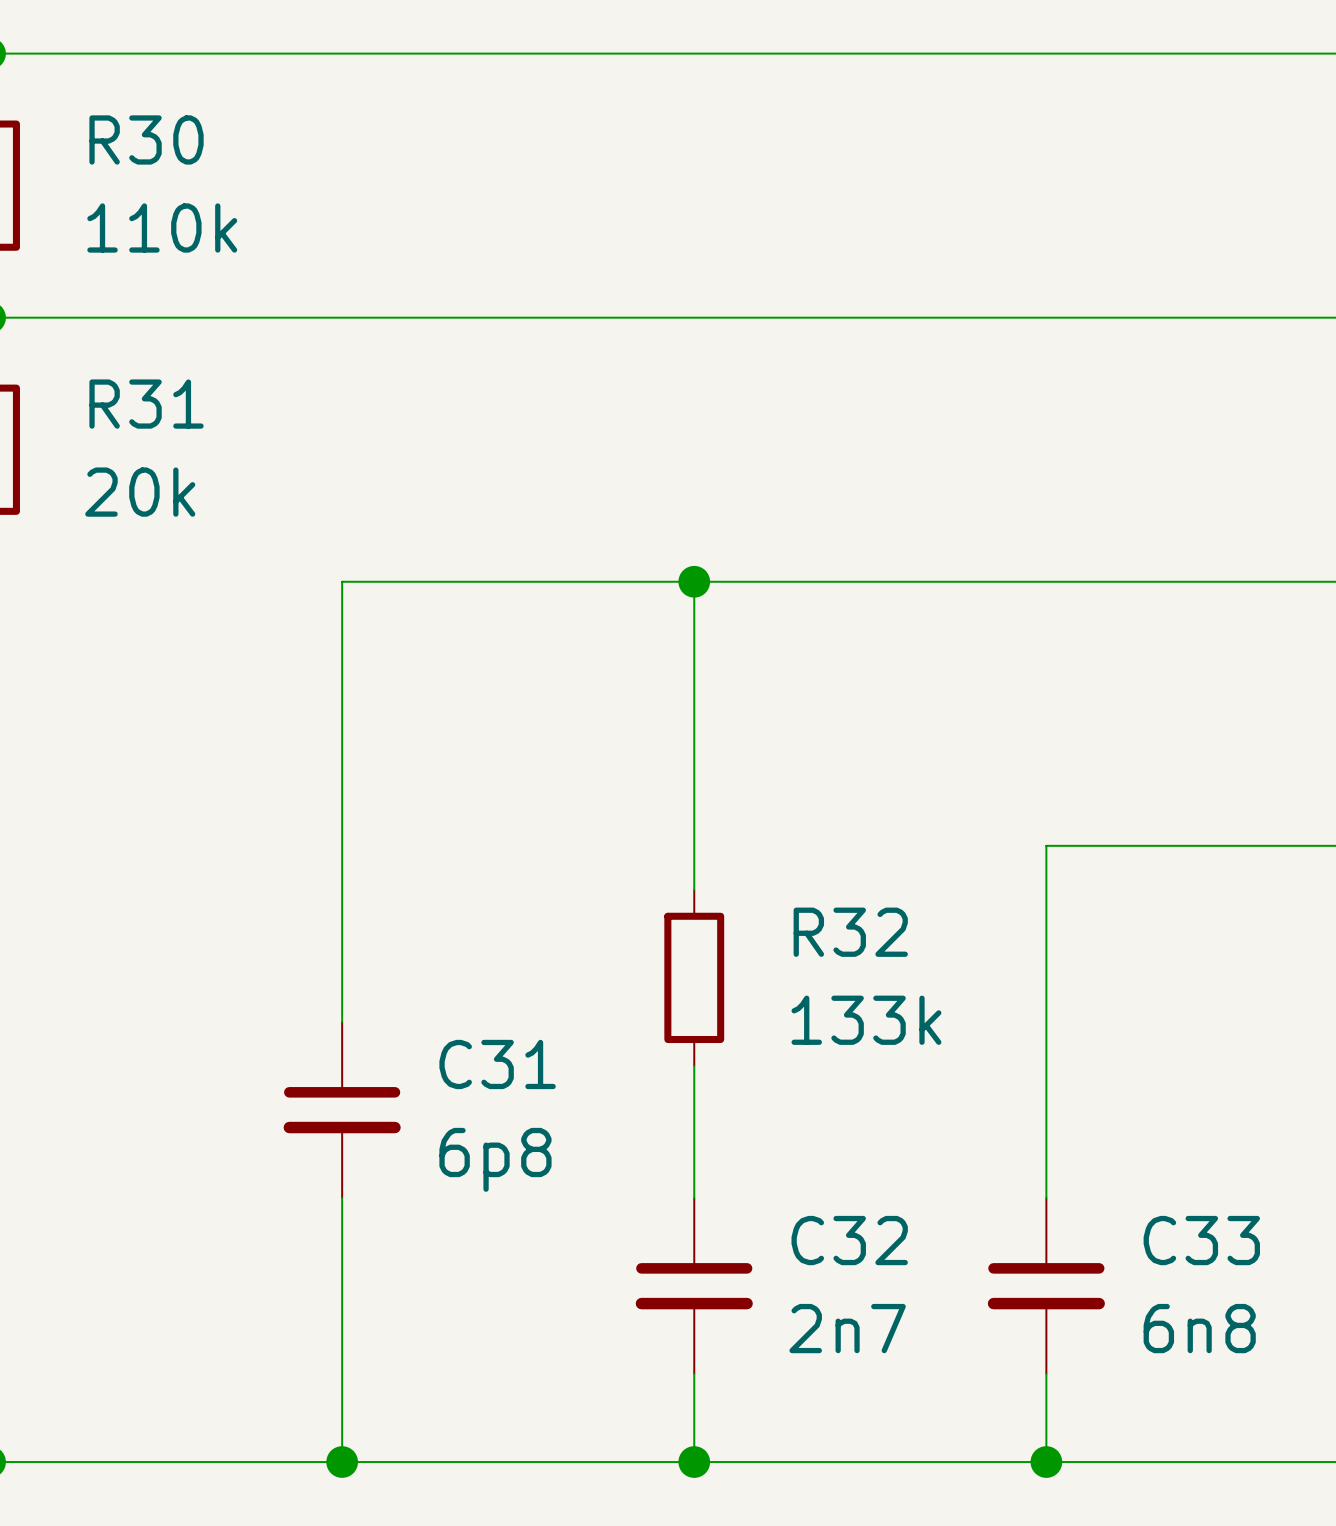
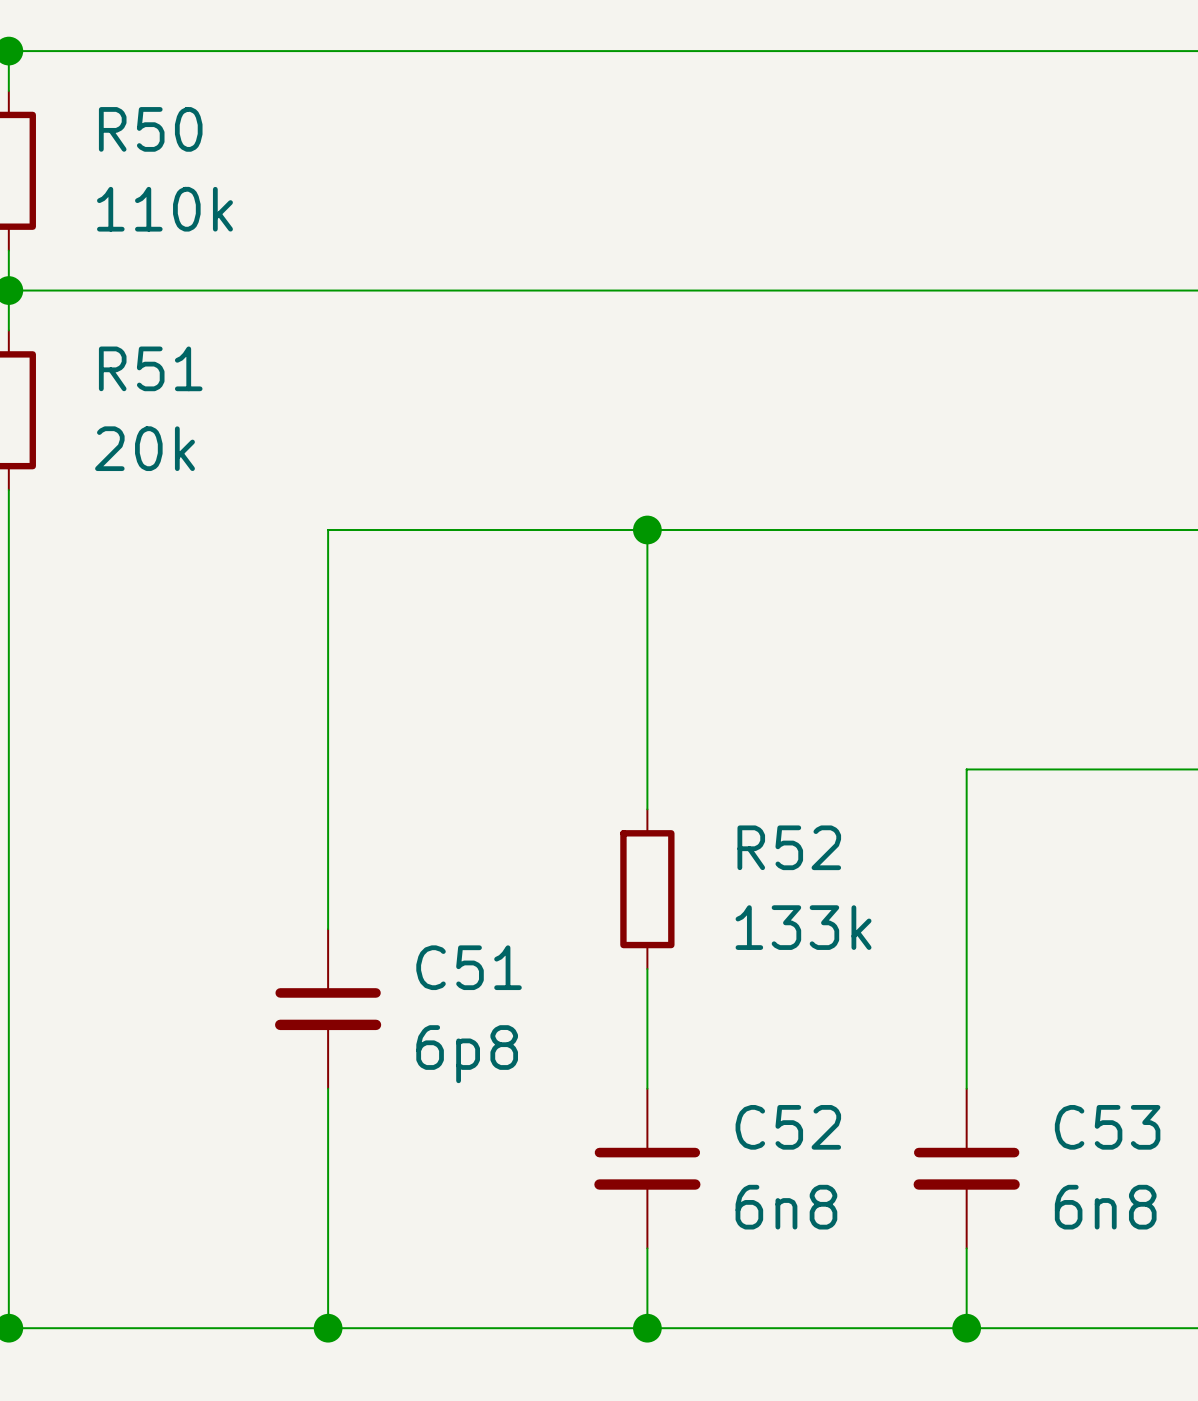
R30 name: R30 (146, 139) -> R50 (150, 129)
R31 name: R31 (146, 404) -> R51 (150, 368)
R32 name: R32 (850, 932) -> R52 (789, 847)
C31 name: C31 (497, 1064) -> C51 (469, 967)
C32 name: C32 (849, 1240) -> C52 (788, 1127)
C33 name: C33 (1201, 1240) -> C53 (1107, 1127)
C32 value: 2n7 (847, 1328) -> 6n8 (786, 1207)

